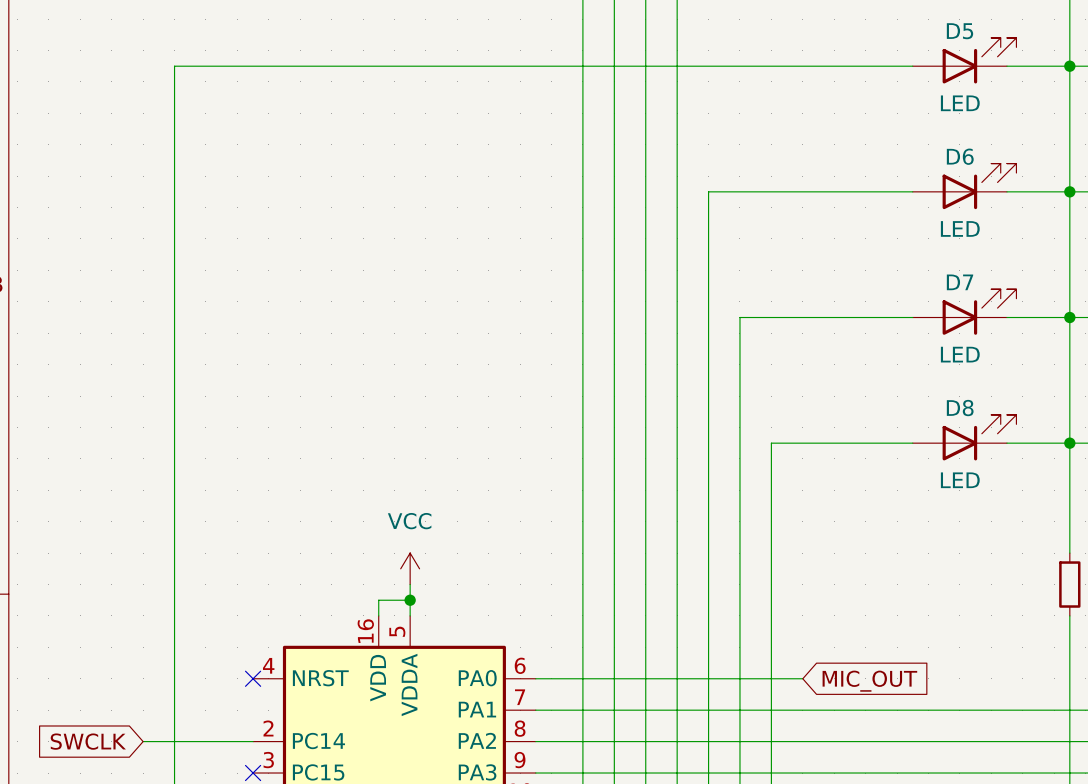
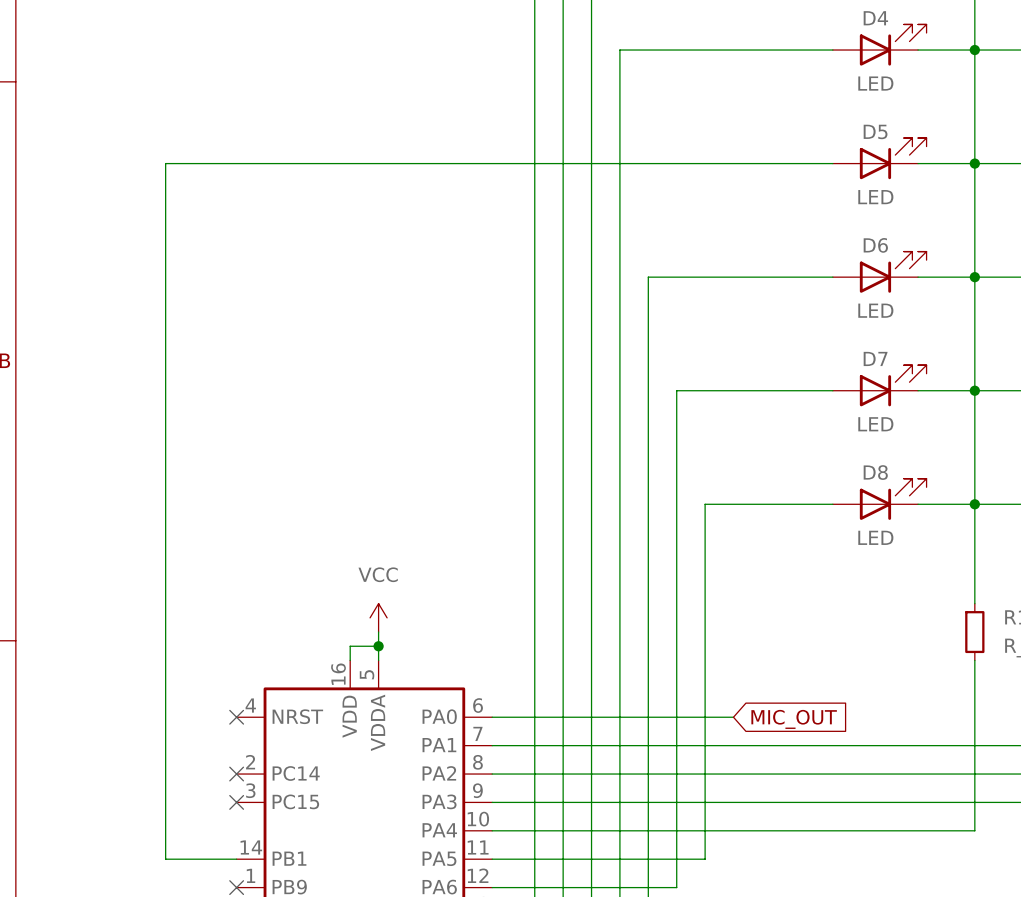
global label: SWCLK (88, 741) -> none
wire: (143, 741) (253, 741) -> none
no-connect mark: none -> (236, 774)

